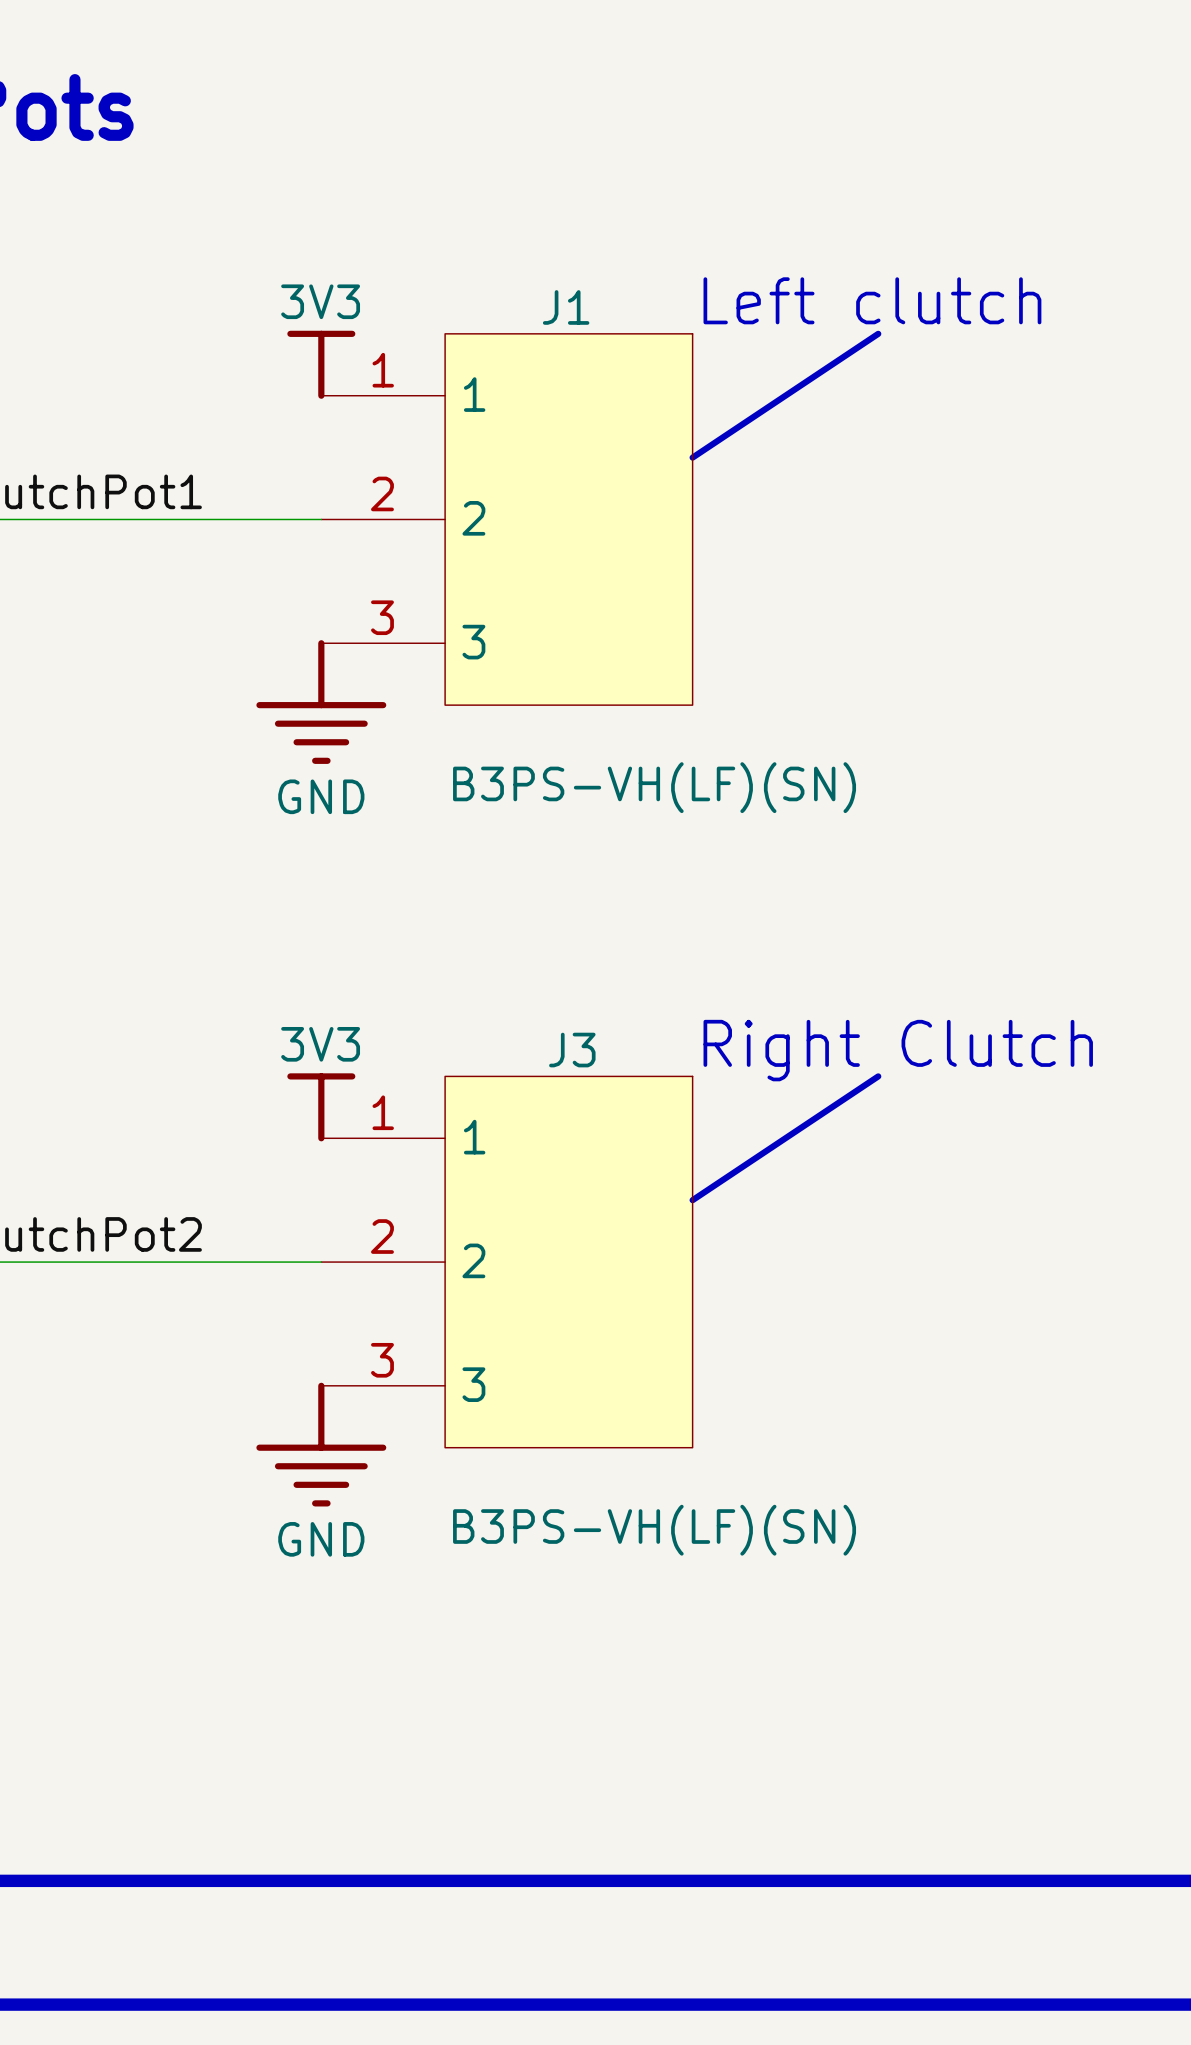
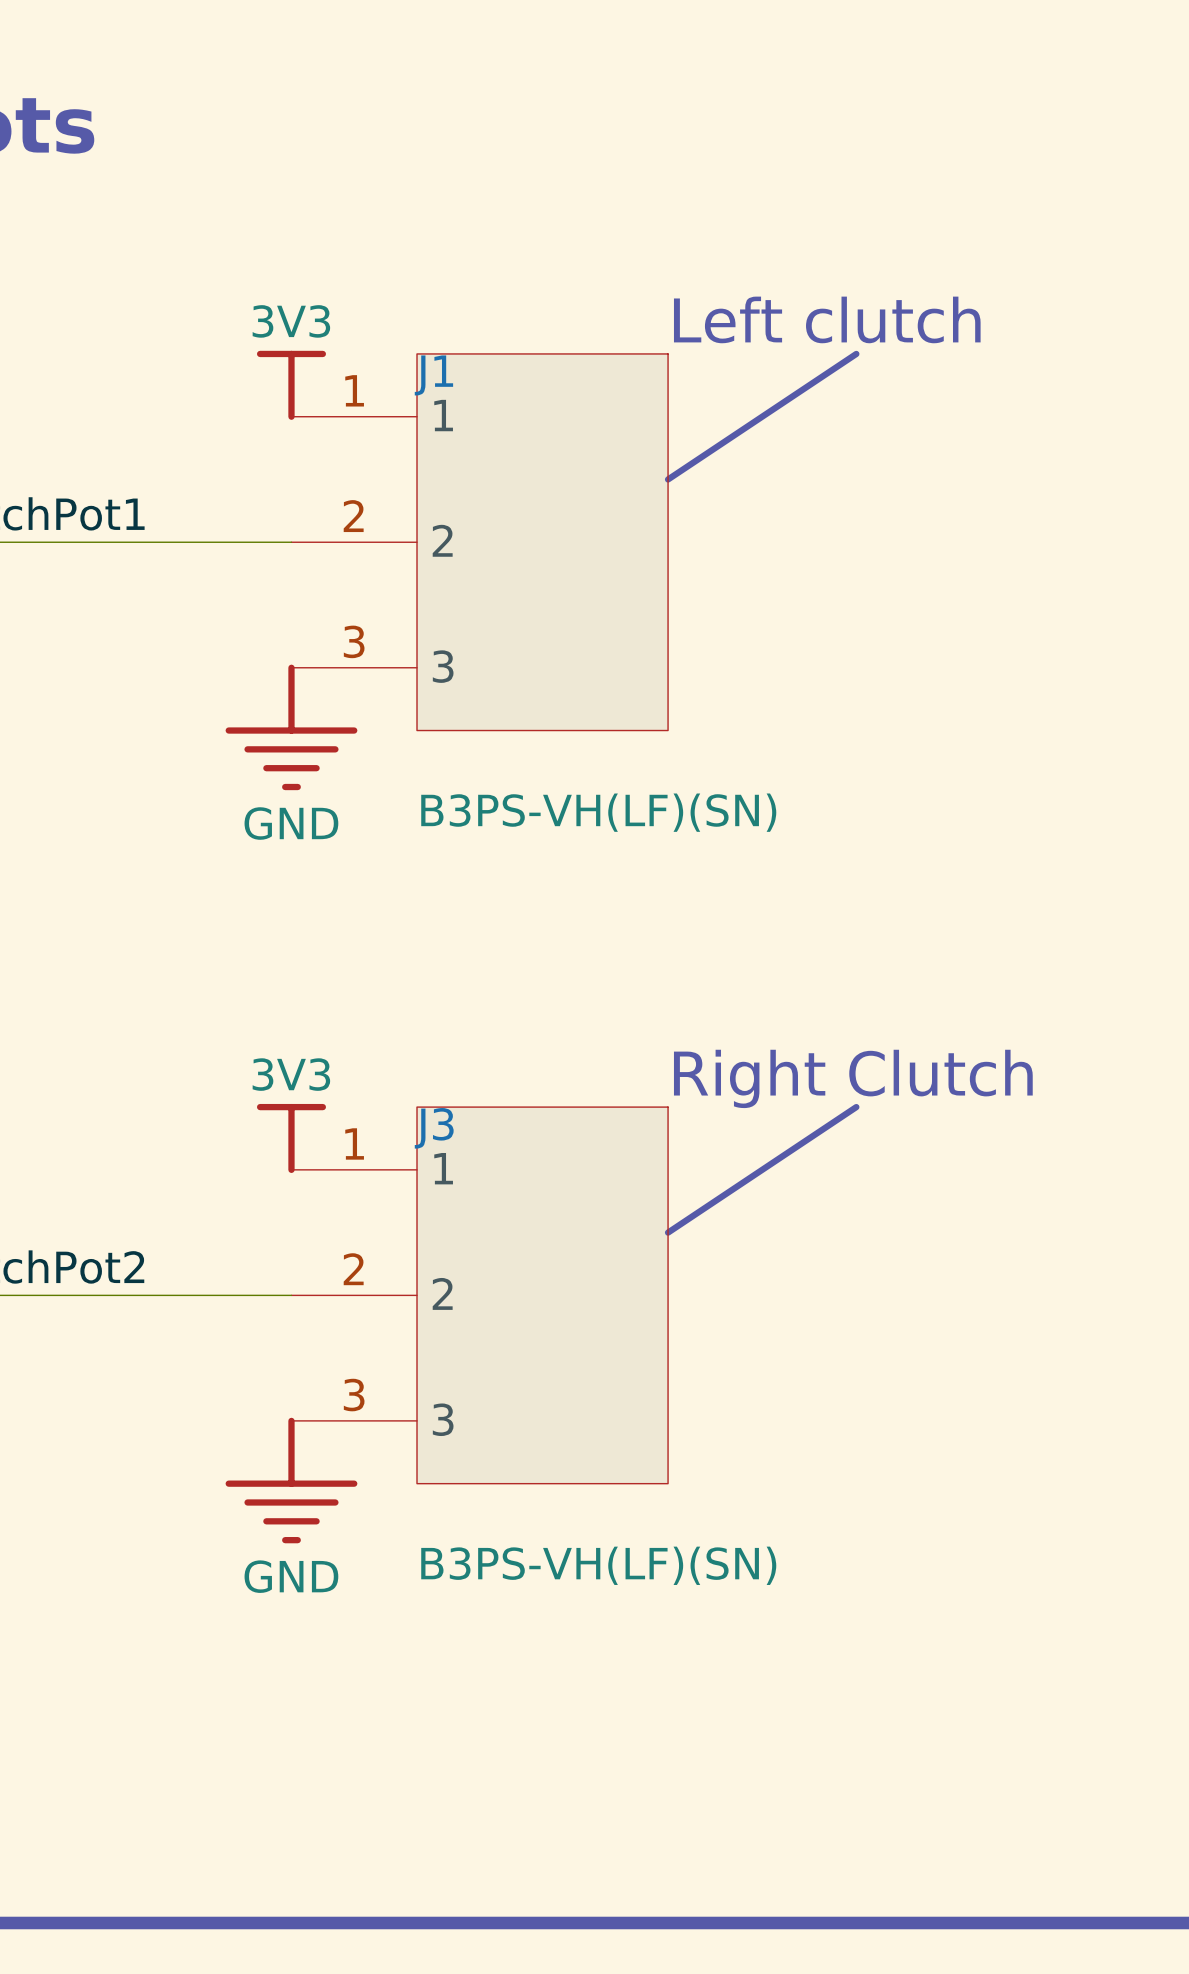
J1 name position: J1 (566, 307) -> J1 (433, 375)
J3 name position: J3 (572, 1050) -> J3 (434, 1128)

